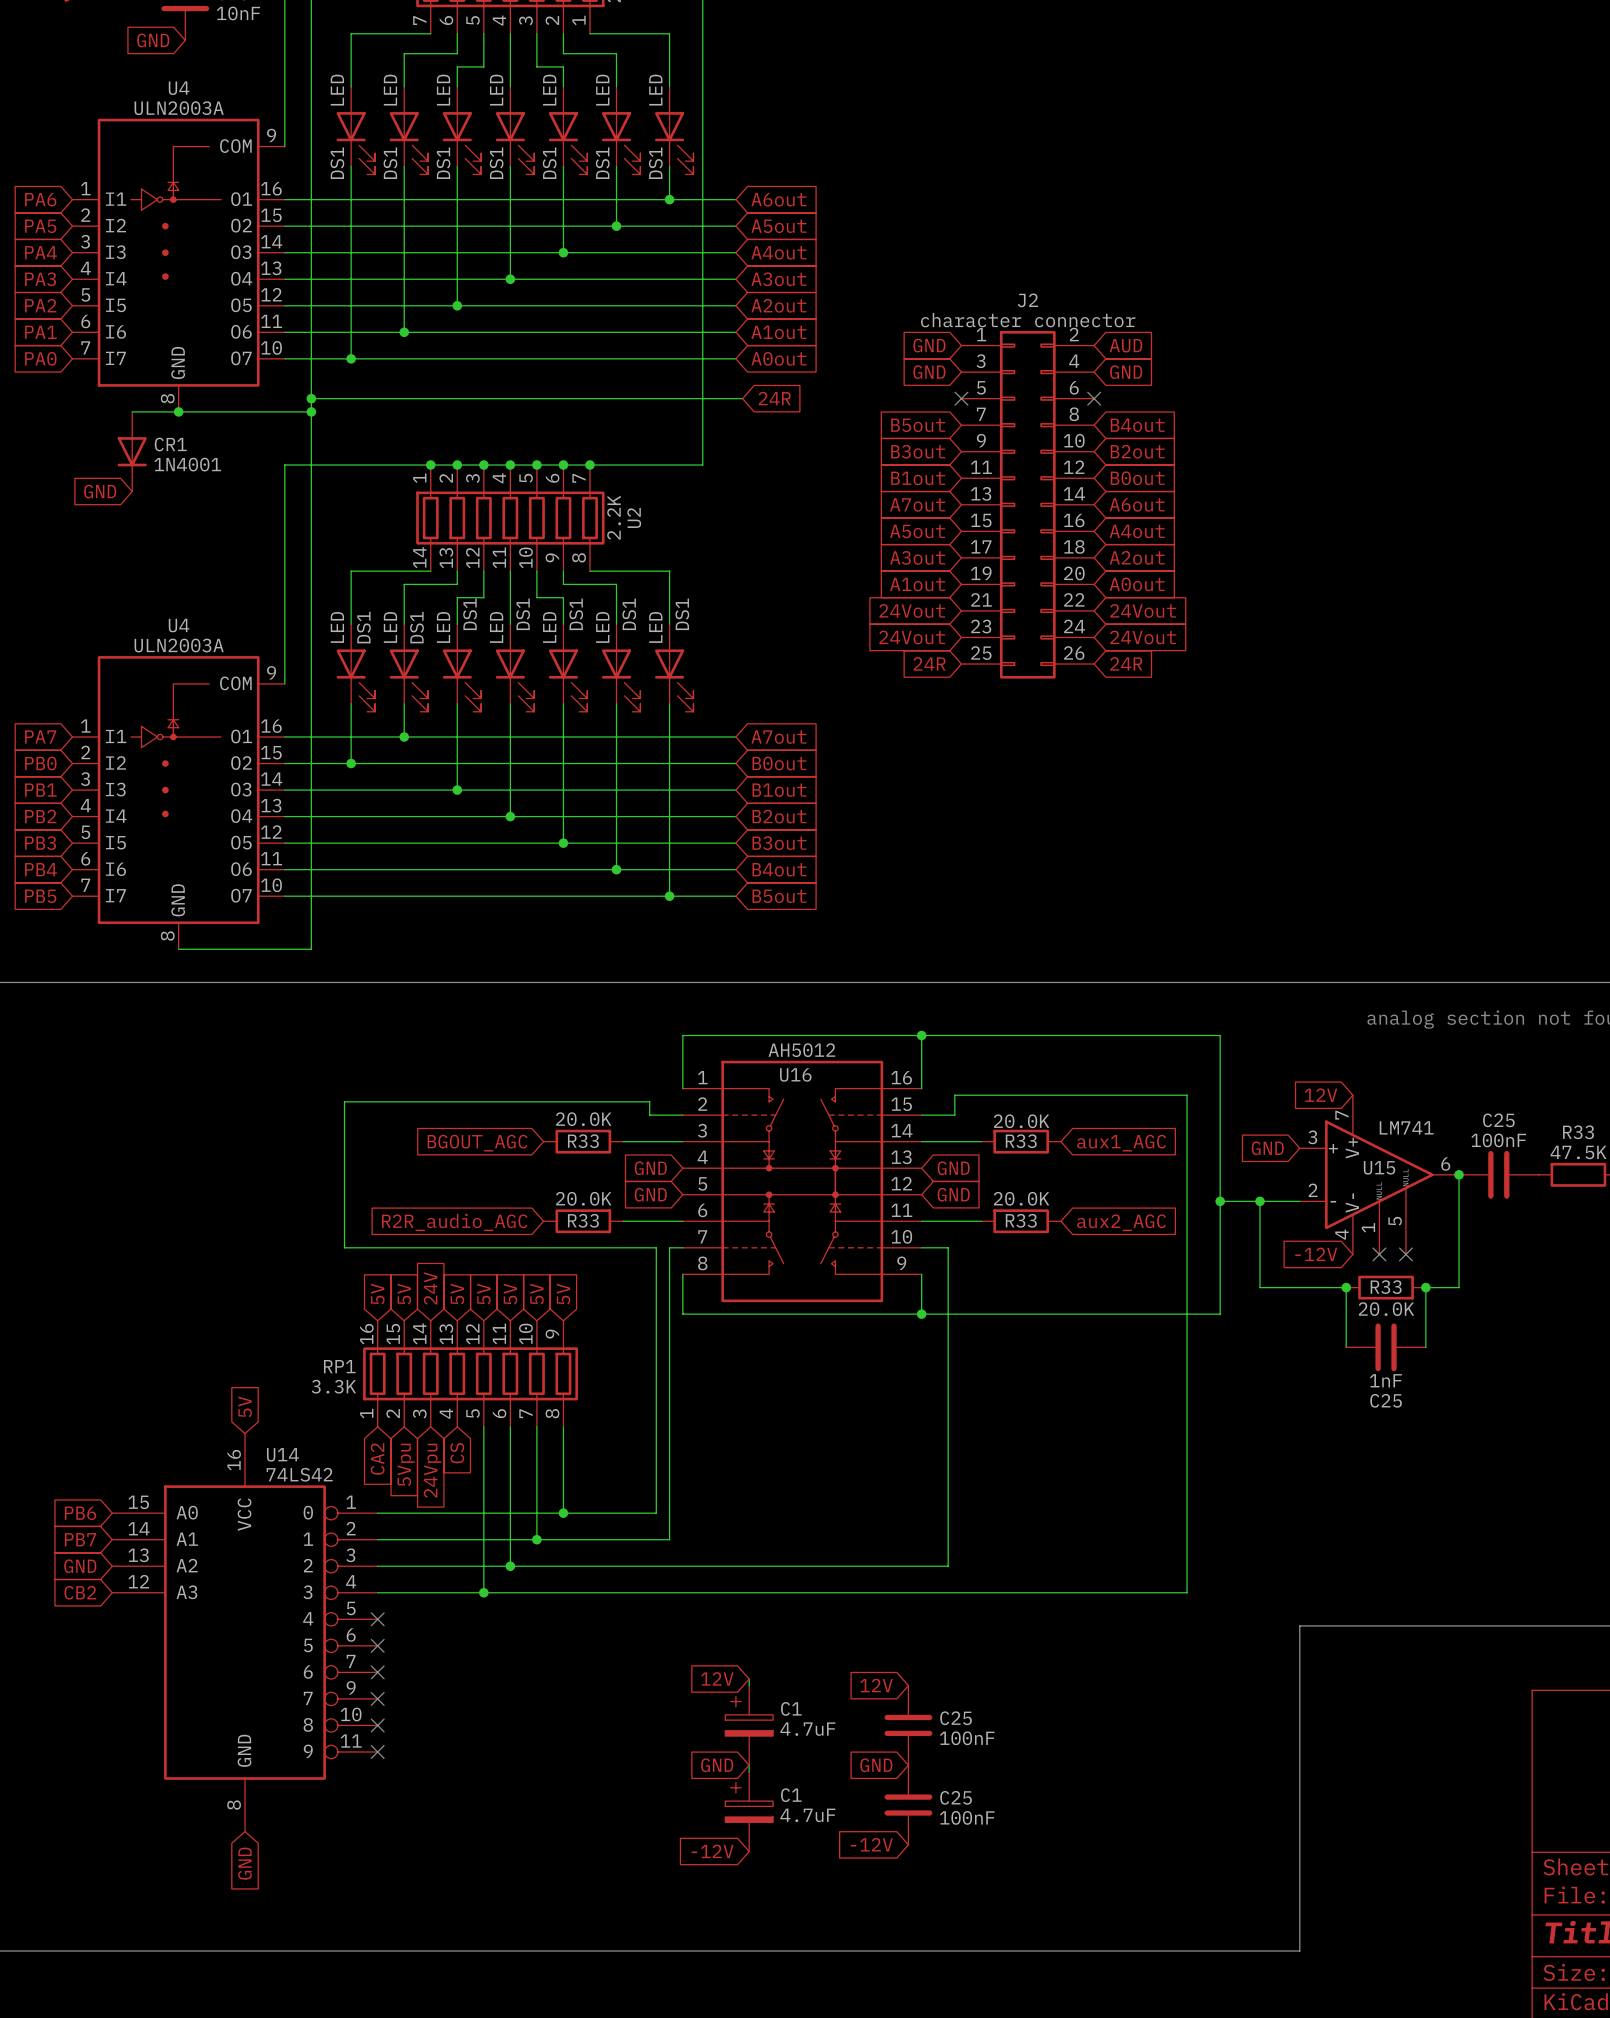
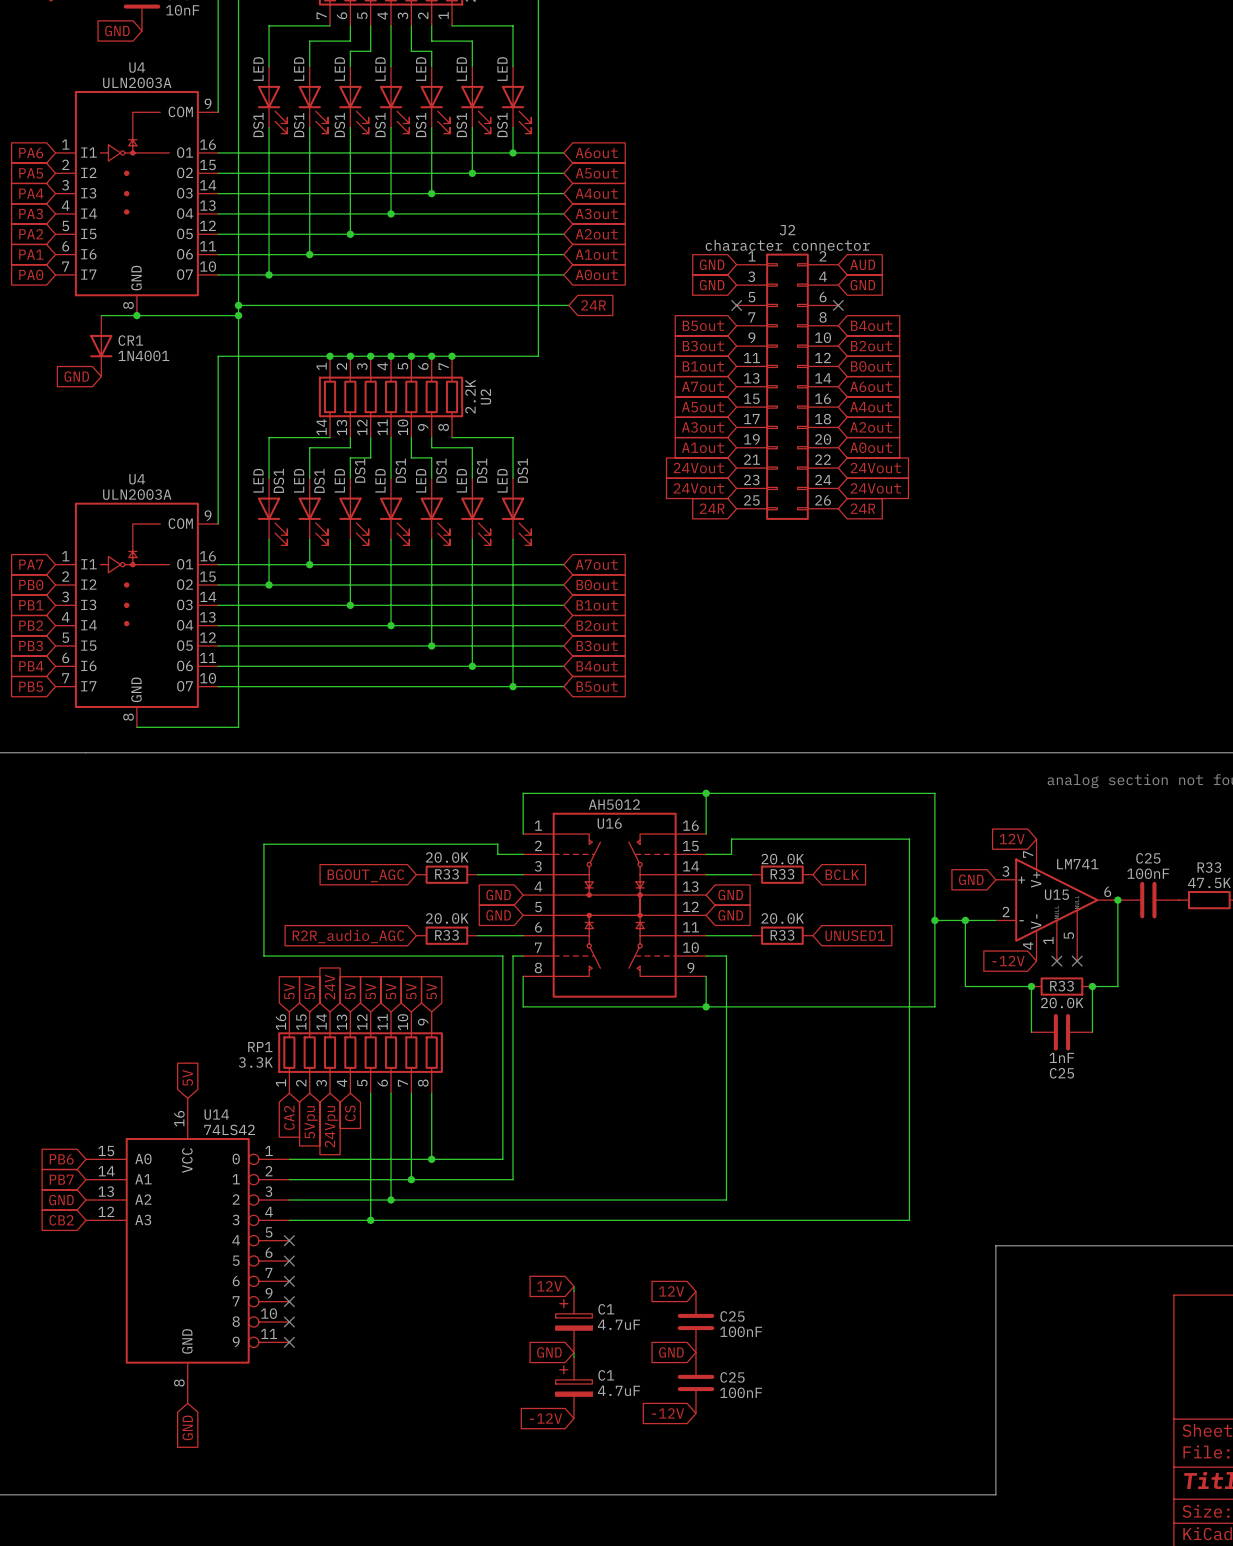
global label: aux1_AGC (1121, 1143) -> BCLK (842, 874)
global label: aux2_AGC (1121, 1222) -> UNUSED1 (855, 935)

